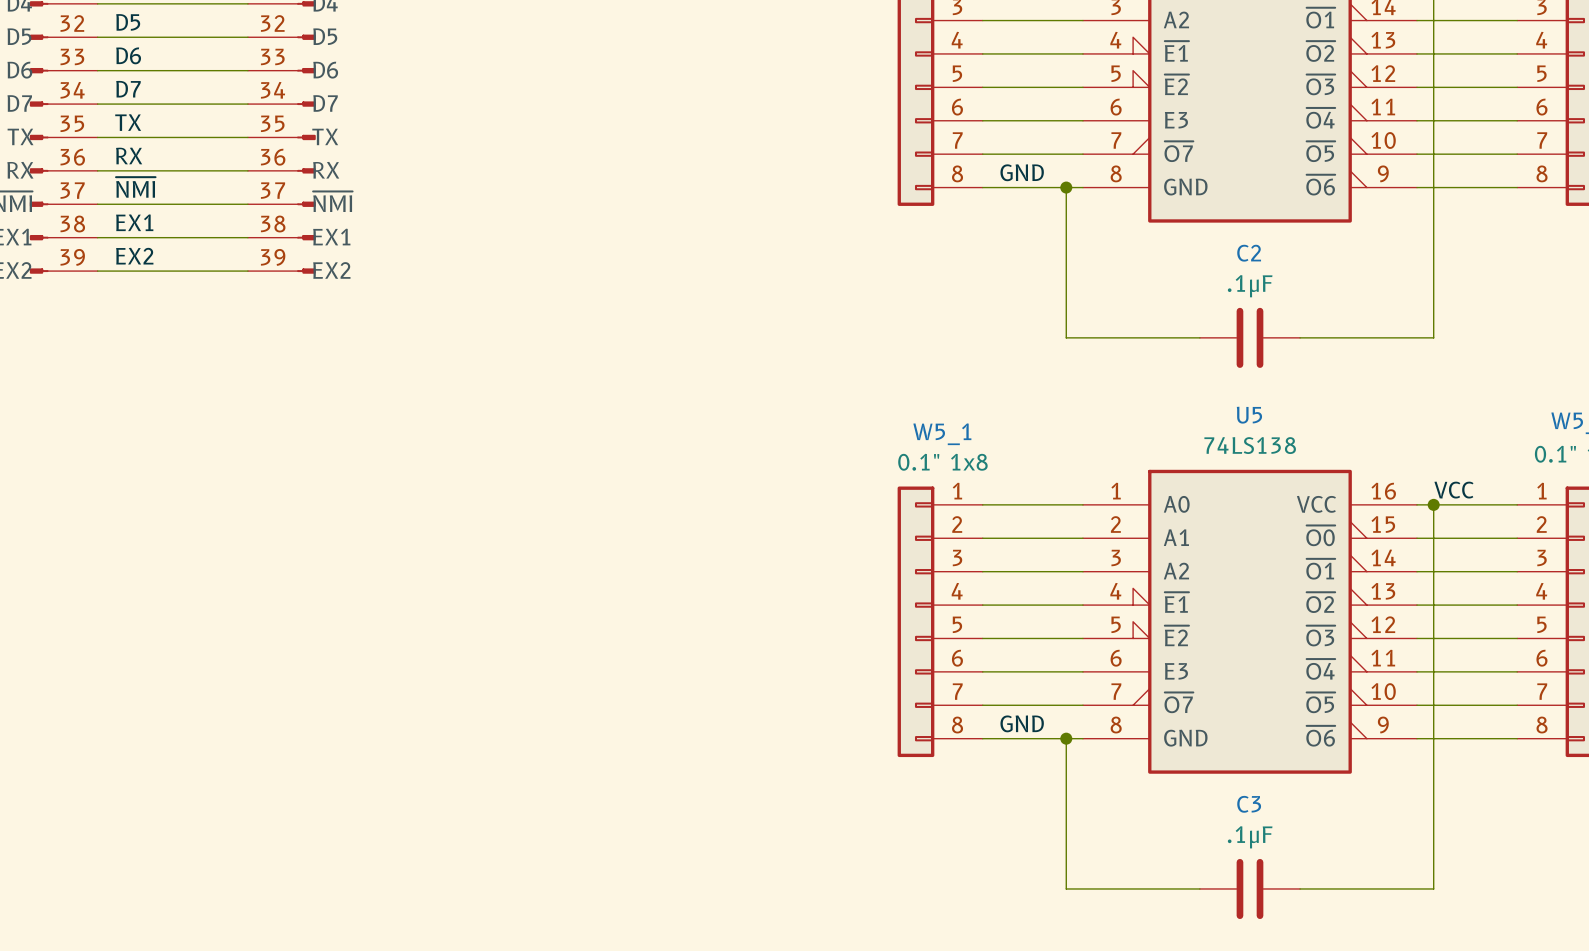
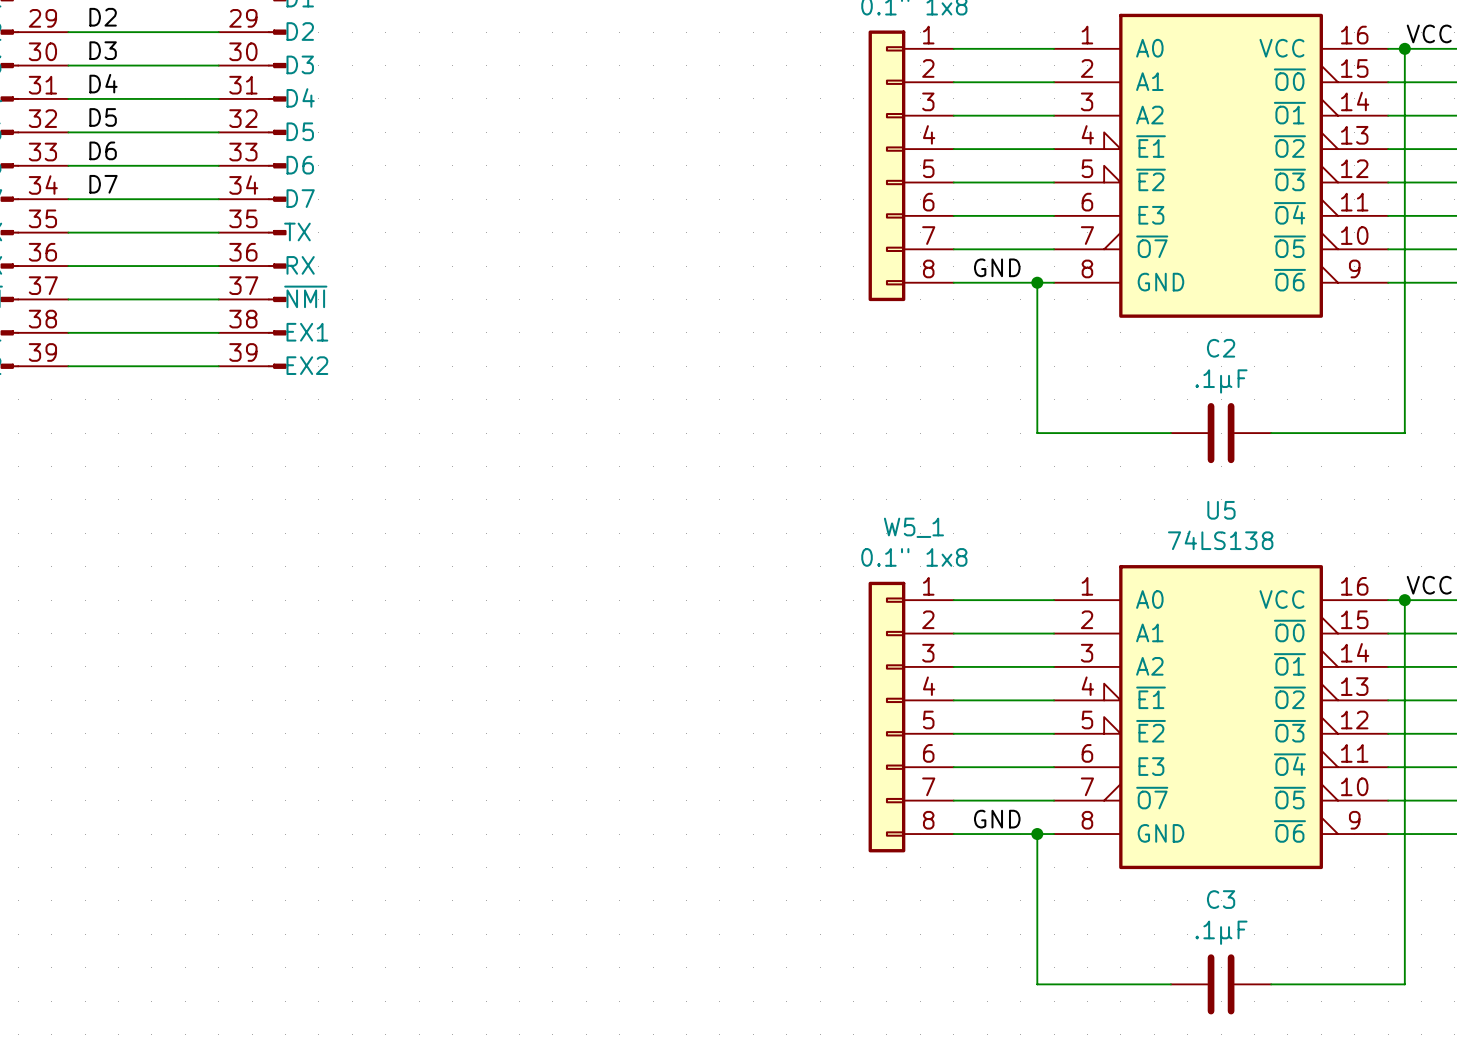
label: TX (128, 122) -> none
label: RX (129, 155) -> none
label: ~{NMI} (135, 187) -> none
label: EX1 (134, 222) -> none
label: EX2 (134, 256) -> none

